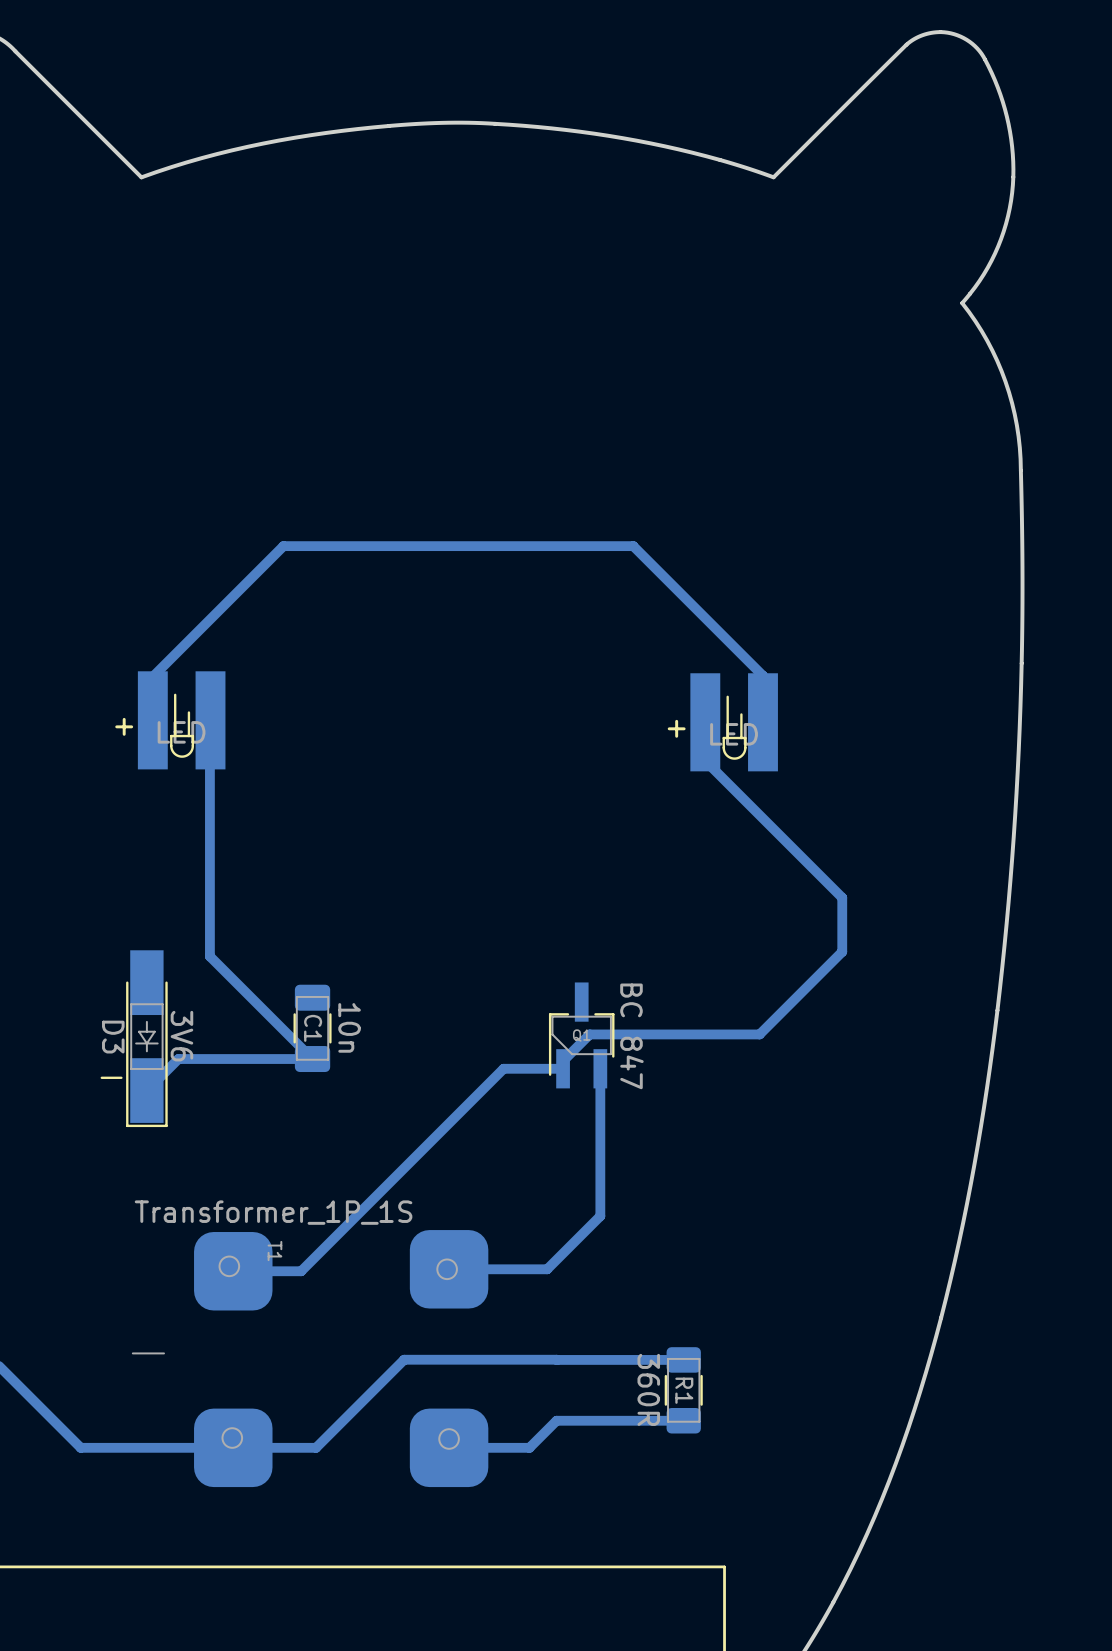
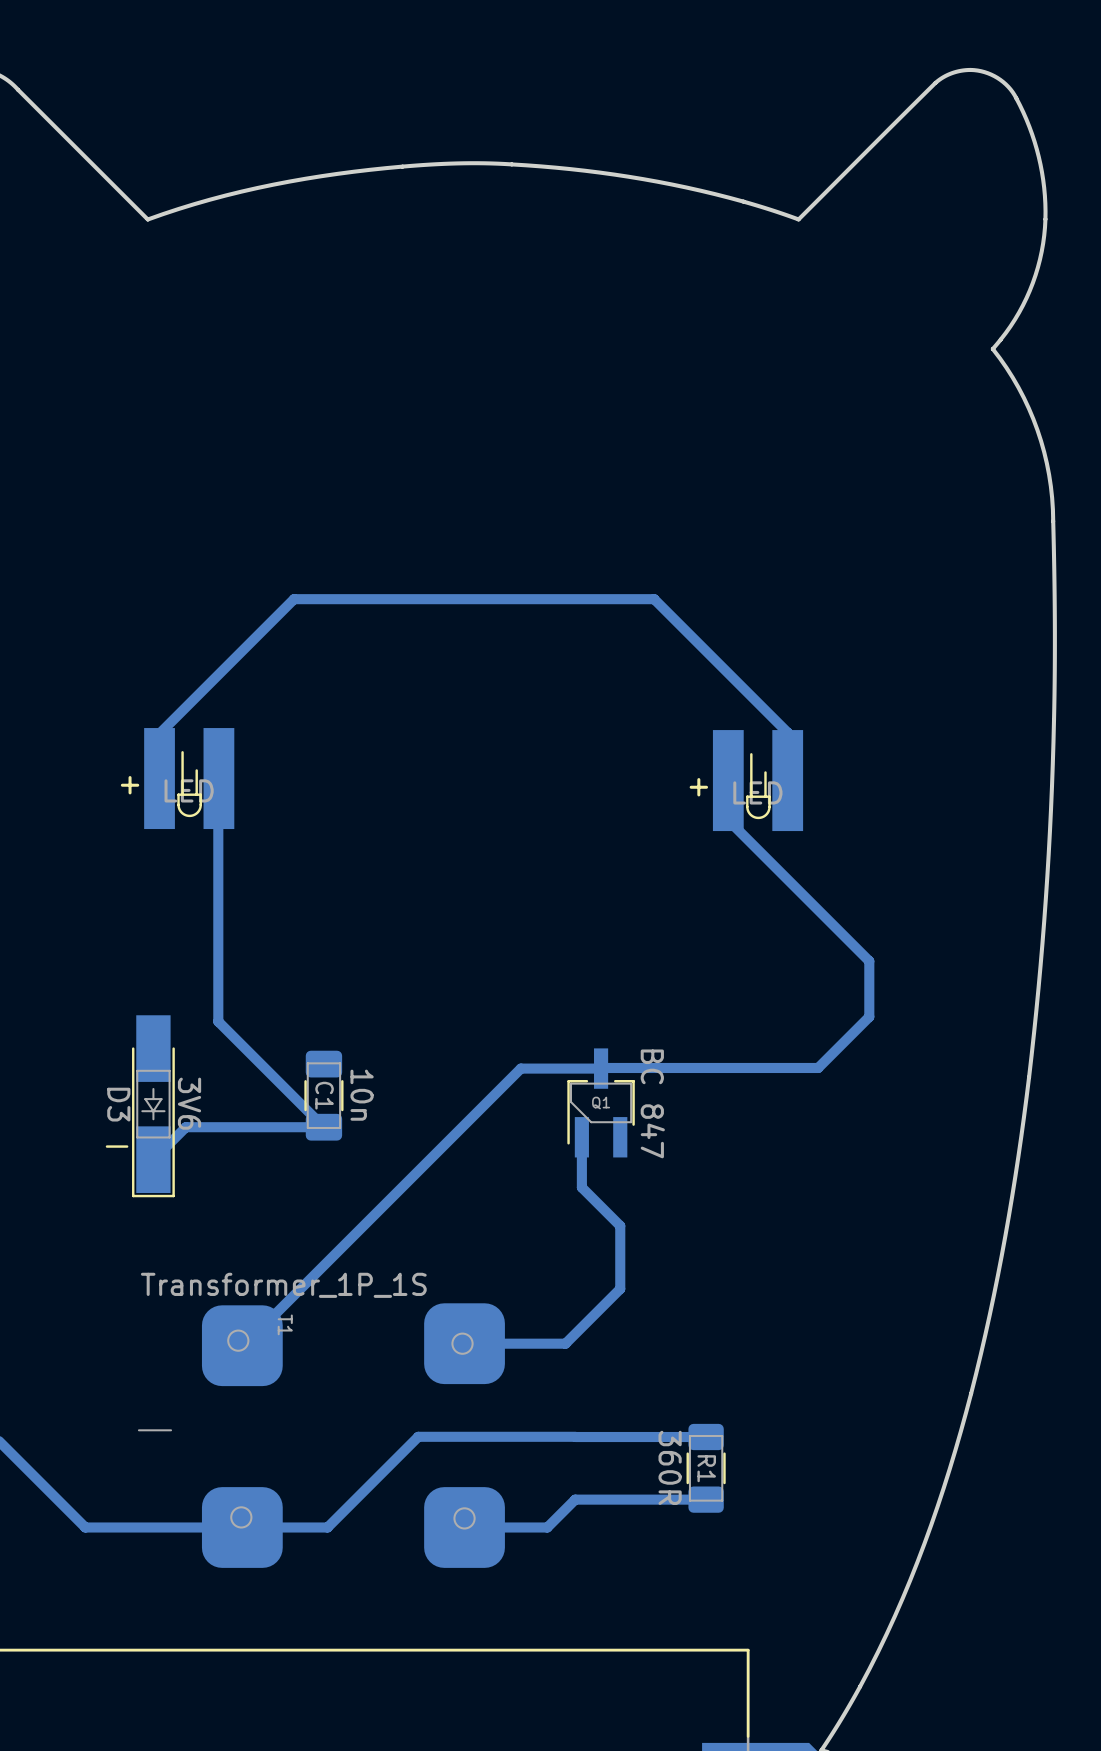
track: (792, 1001) (759, 1034) (589, 1034) (563, 1061) -> none
track: (563, 1068) (503, 1068) (301, 1271) (234, 1271) -> (818, 1067) (520, 1068) (243, 1345)
track: (600, 1068) (600, 1154) -> (581, 1137) (581, 1187) (620, 1225)

